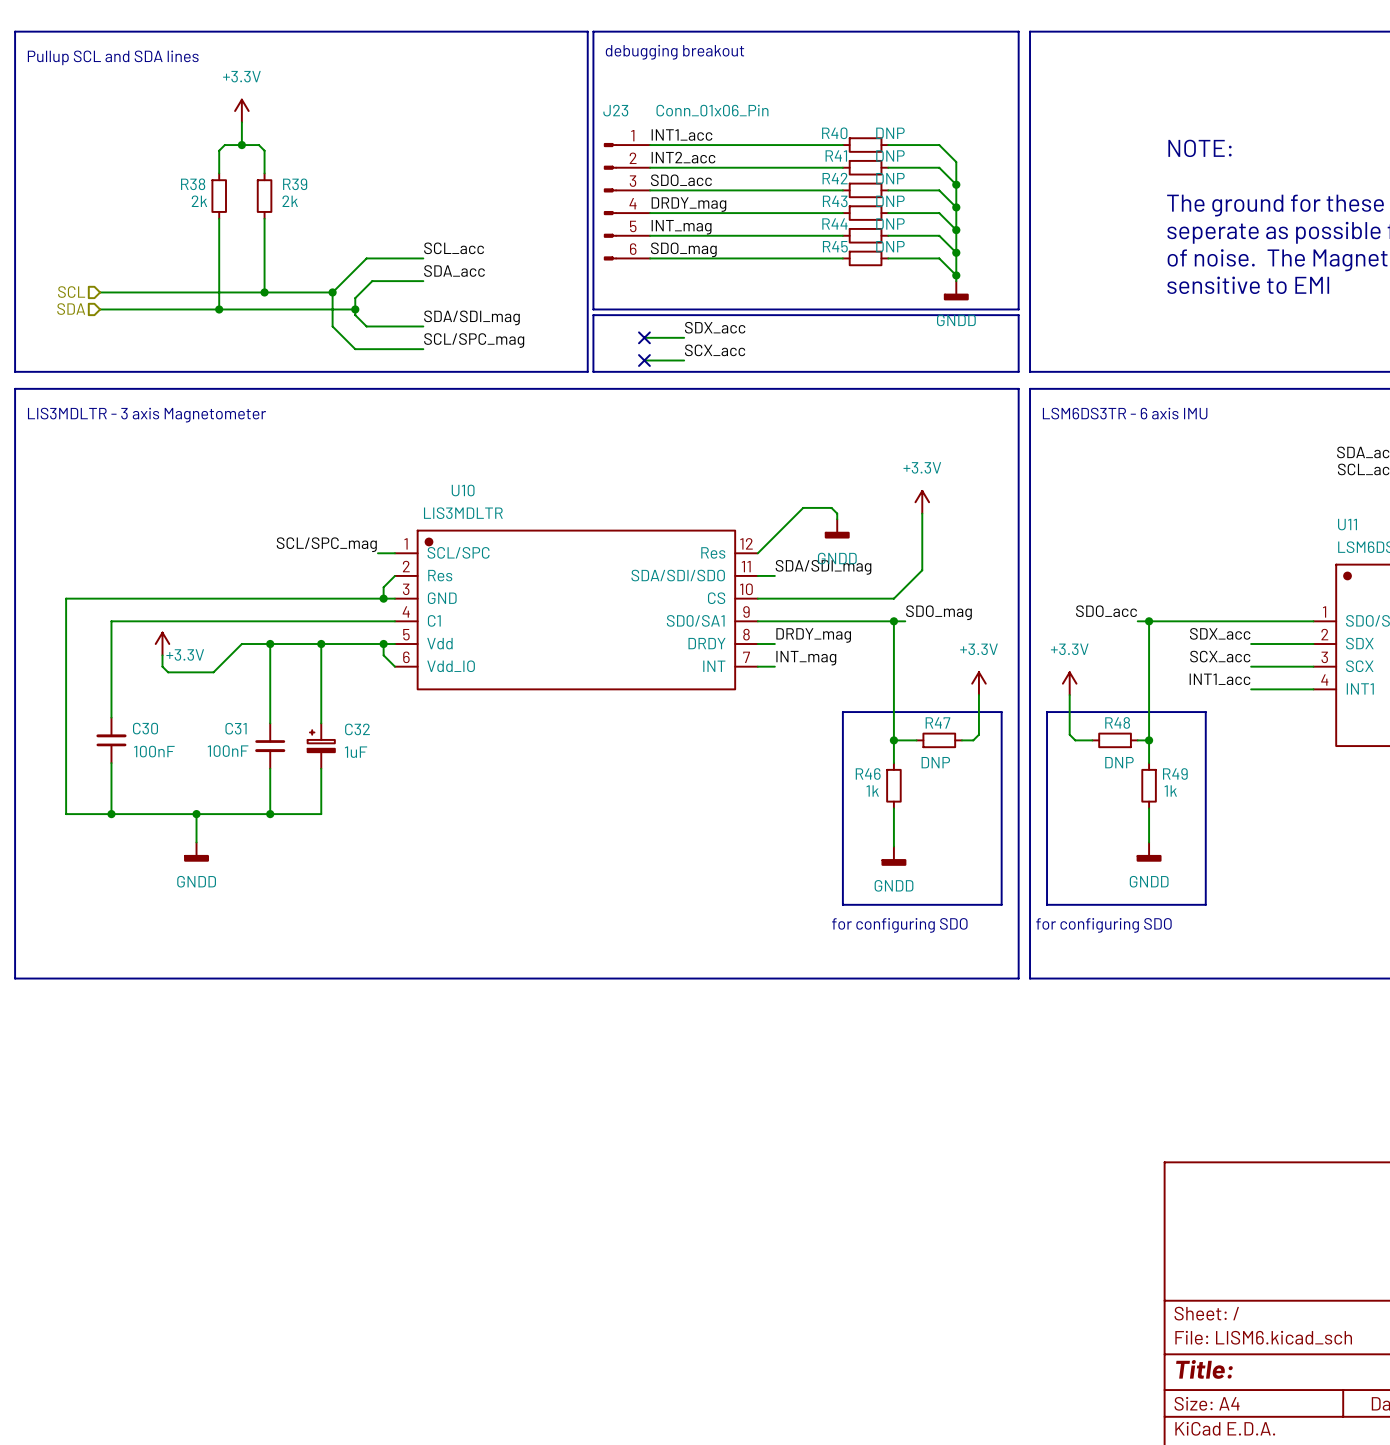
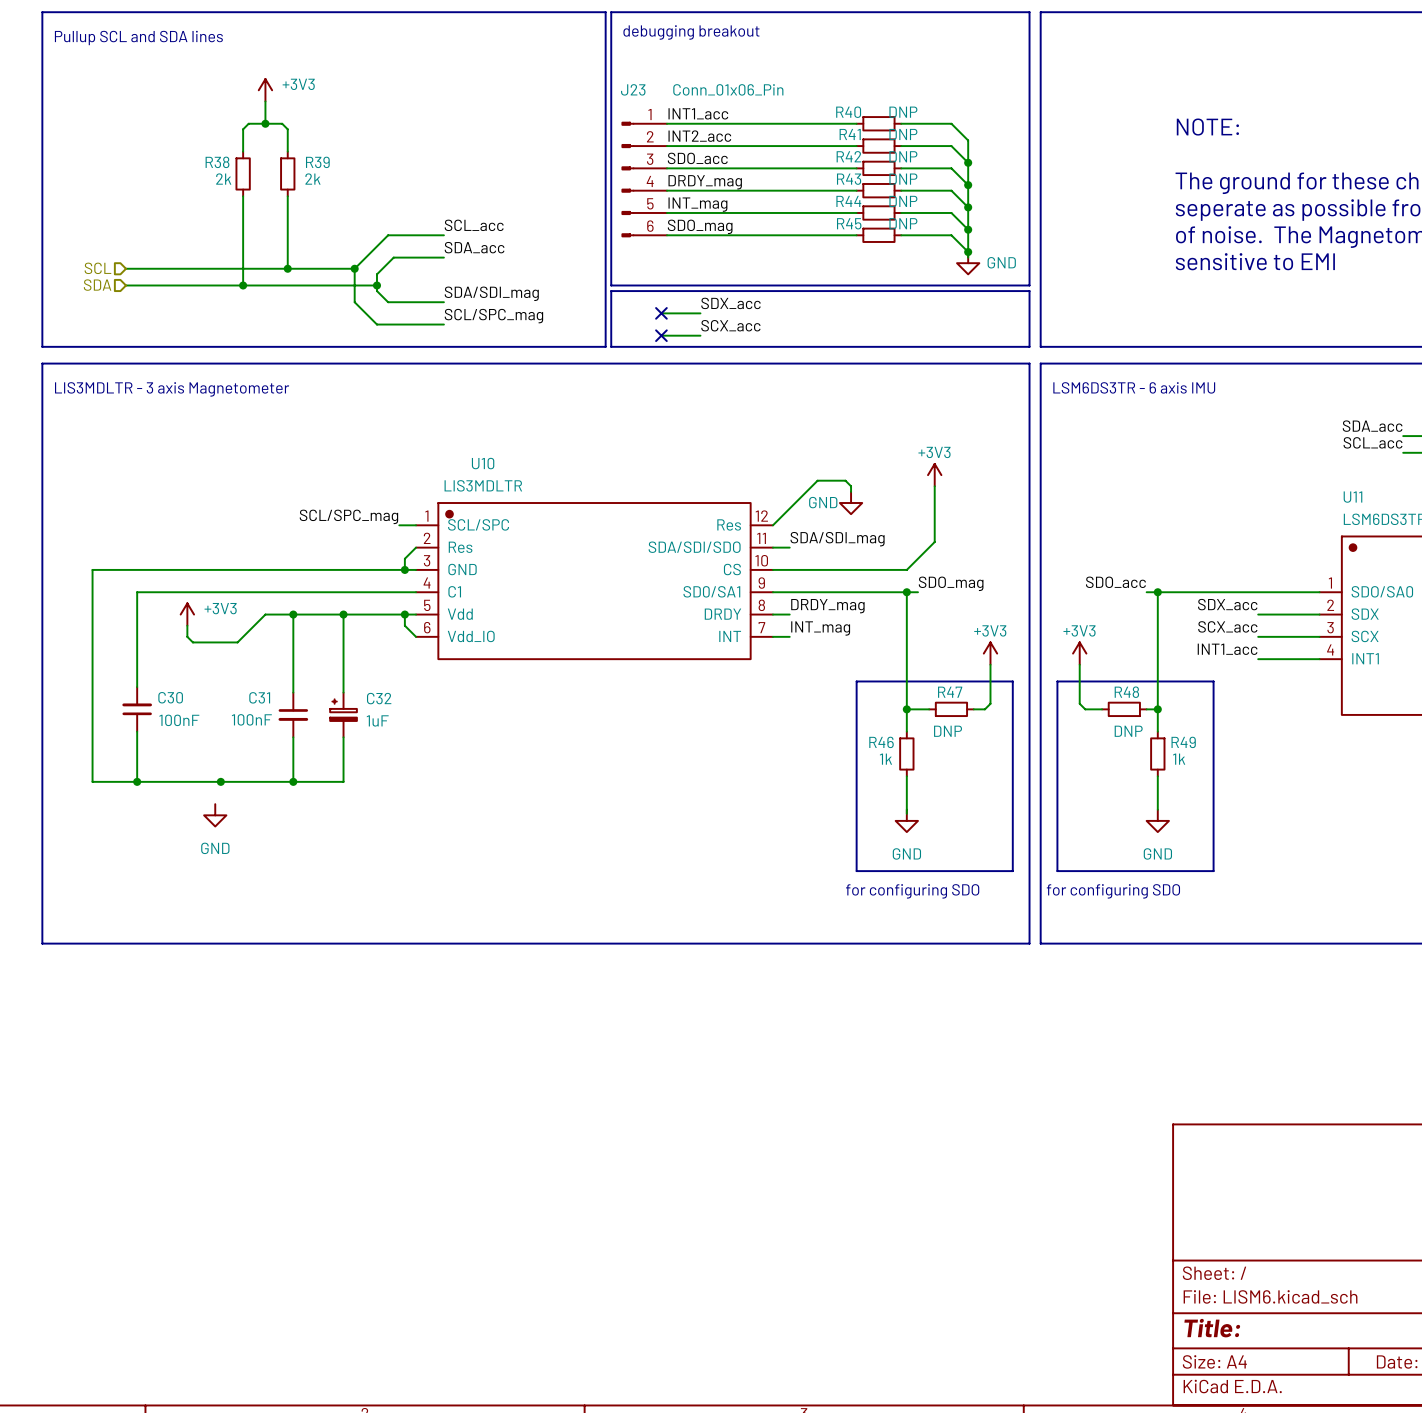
power symbol: +3.3V (241, 111) -> +3V3 (265, 90)
power symbol: GNDD (956, 290) -> GND (968, 263)
power symbol: +3.3V (922, 502) -> +3V3 (934, 475)
power symbol: GNDD (837, 528) -> GND (851, 503)
power symbol: +3.3V (162, 644) -> +3V3 (187, 614)
power symbol: +3.3V (978, 683) -> +3V3 (990, 653)
power symbol: +3.3V (1069, 683) -> +3V3 (1079, 653)
wire: (196, 814) (196, 842) -> none
power symbol: GNDD (196, 852) -> GND (215, 815)
power symbol: GNDD (1149, 852) -> GND (1157, 820)
power symbol: GNDD (893, 856) -> GND (906, 820)

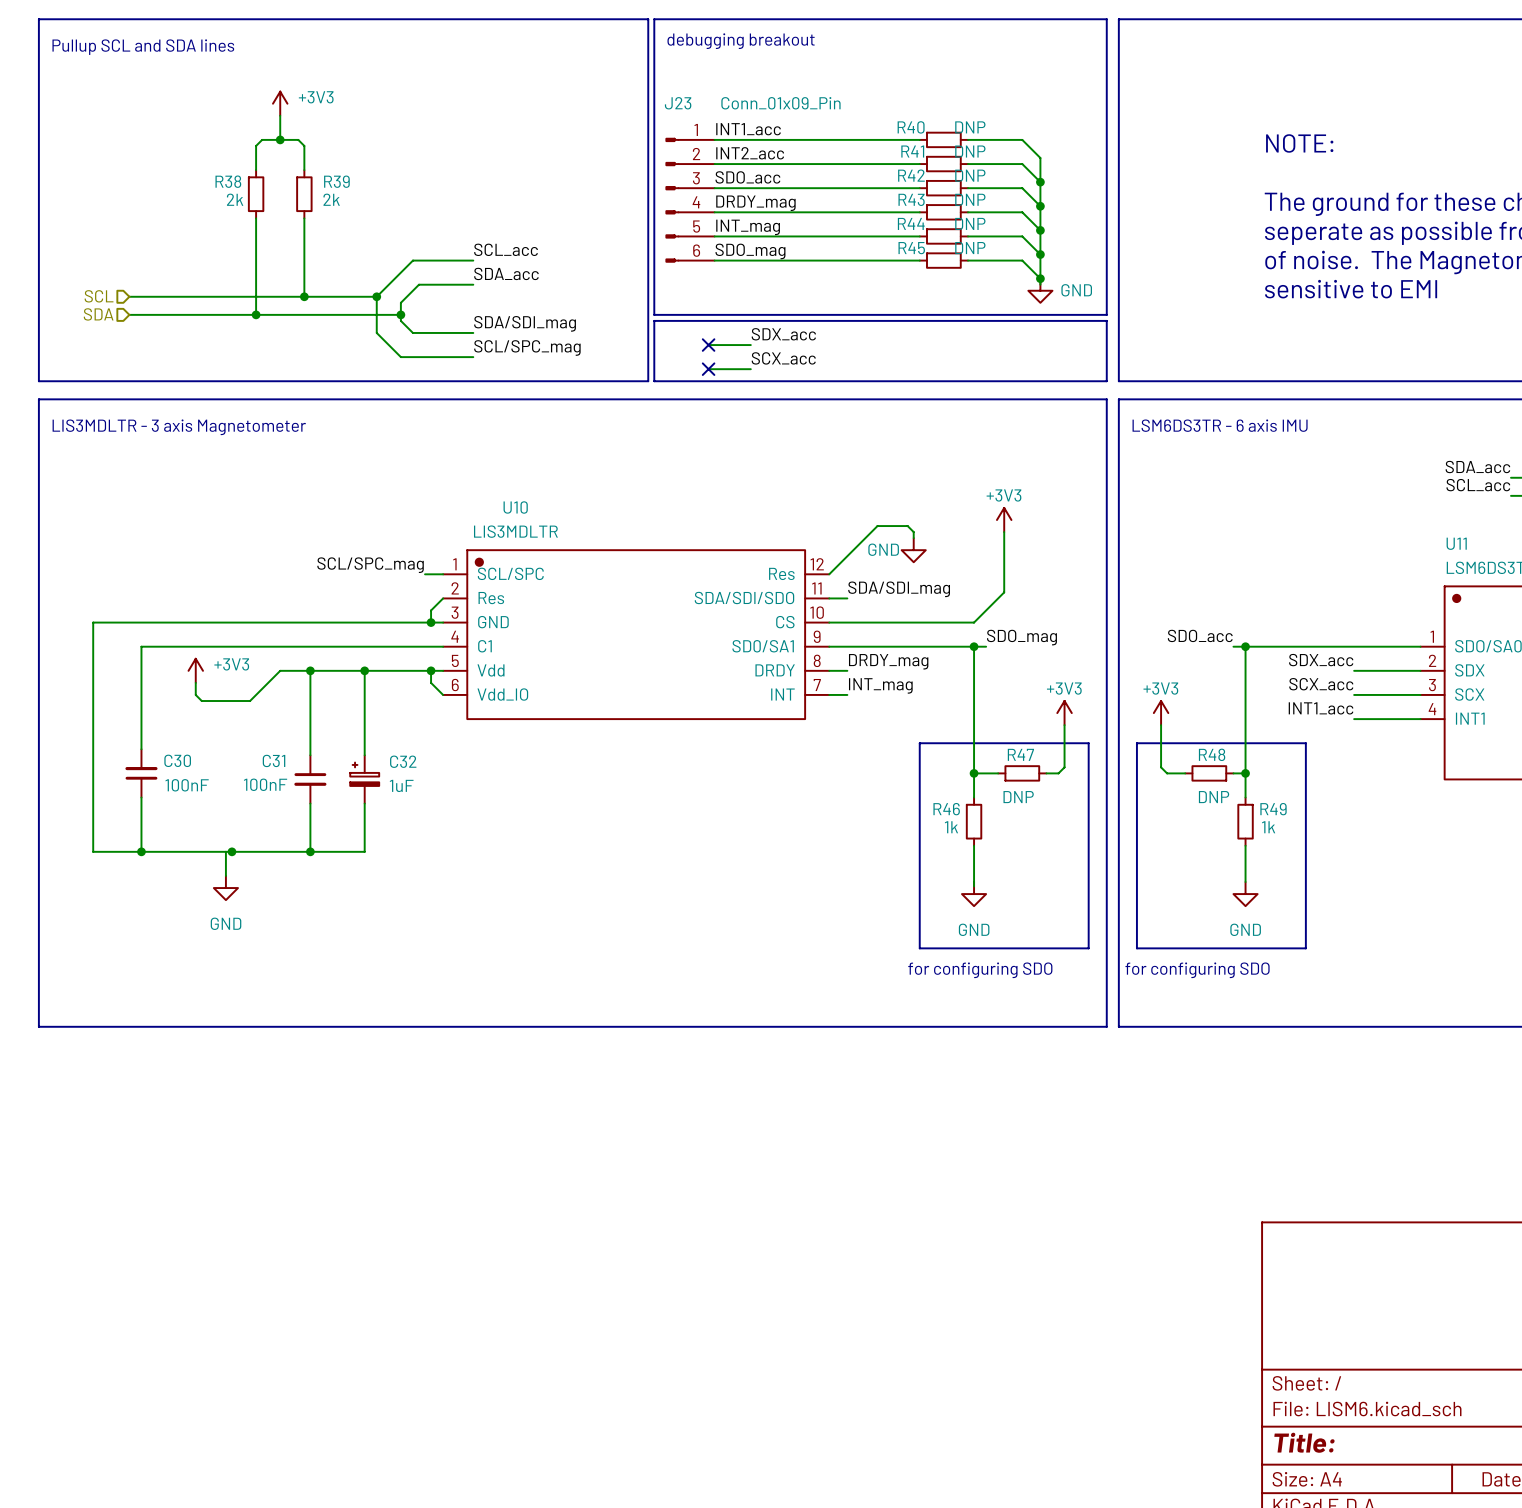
J23 value: Conn_01x06_Pin (728, 89) -> Conn_01x09_Pin (780, 103)
wire: none -> (225, 851) (225, 875)

